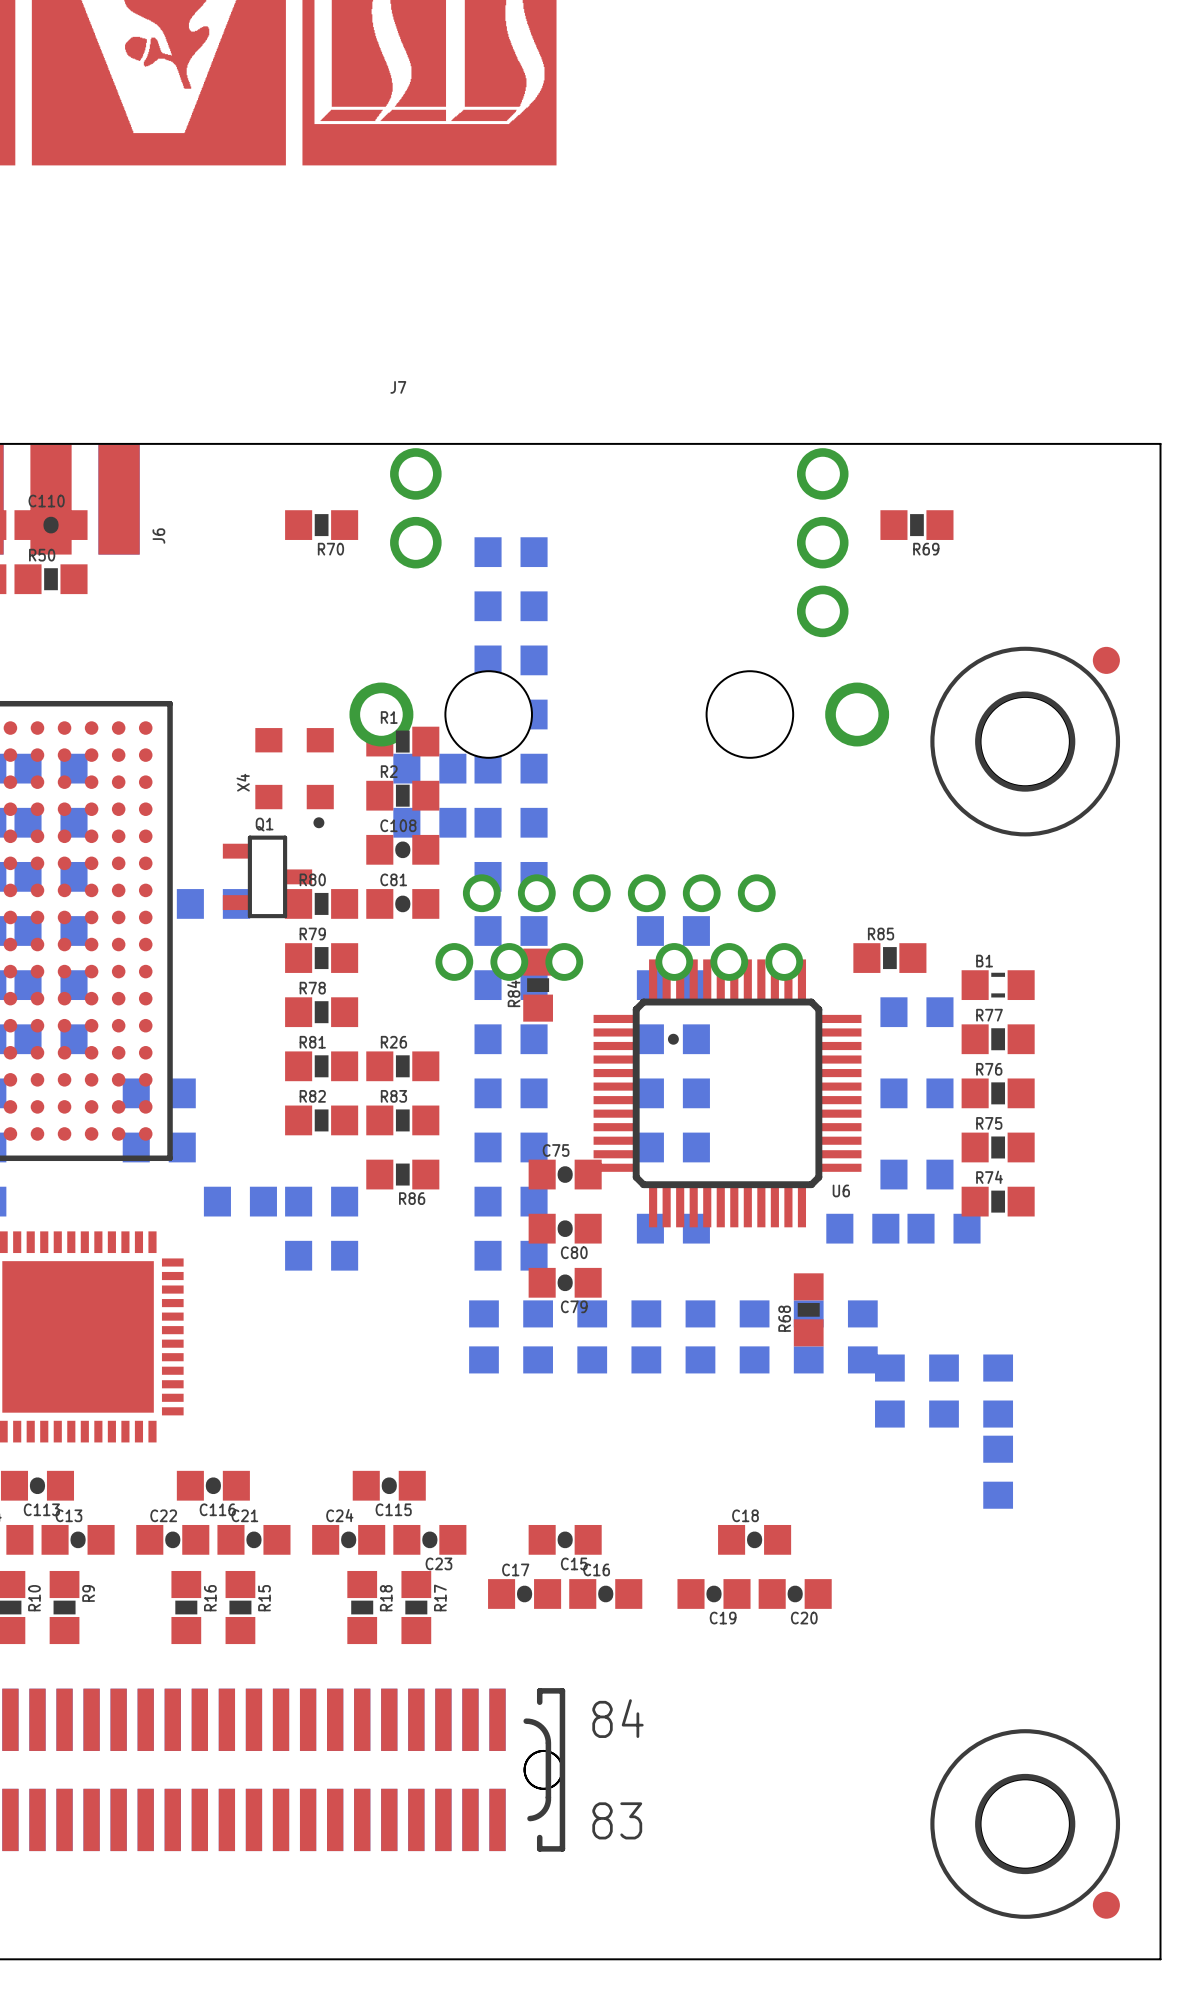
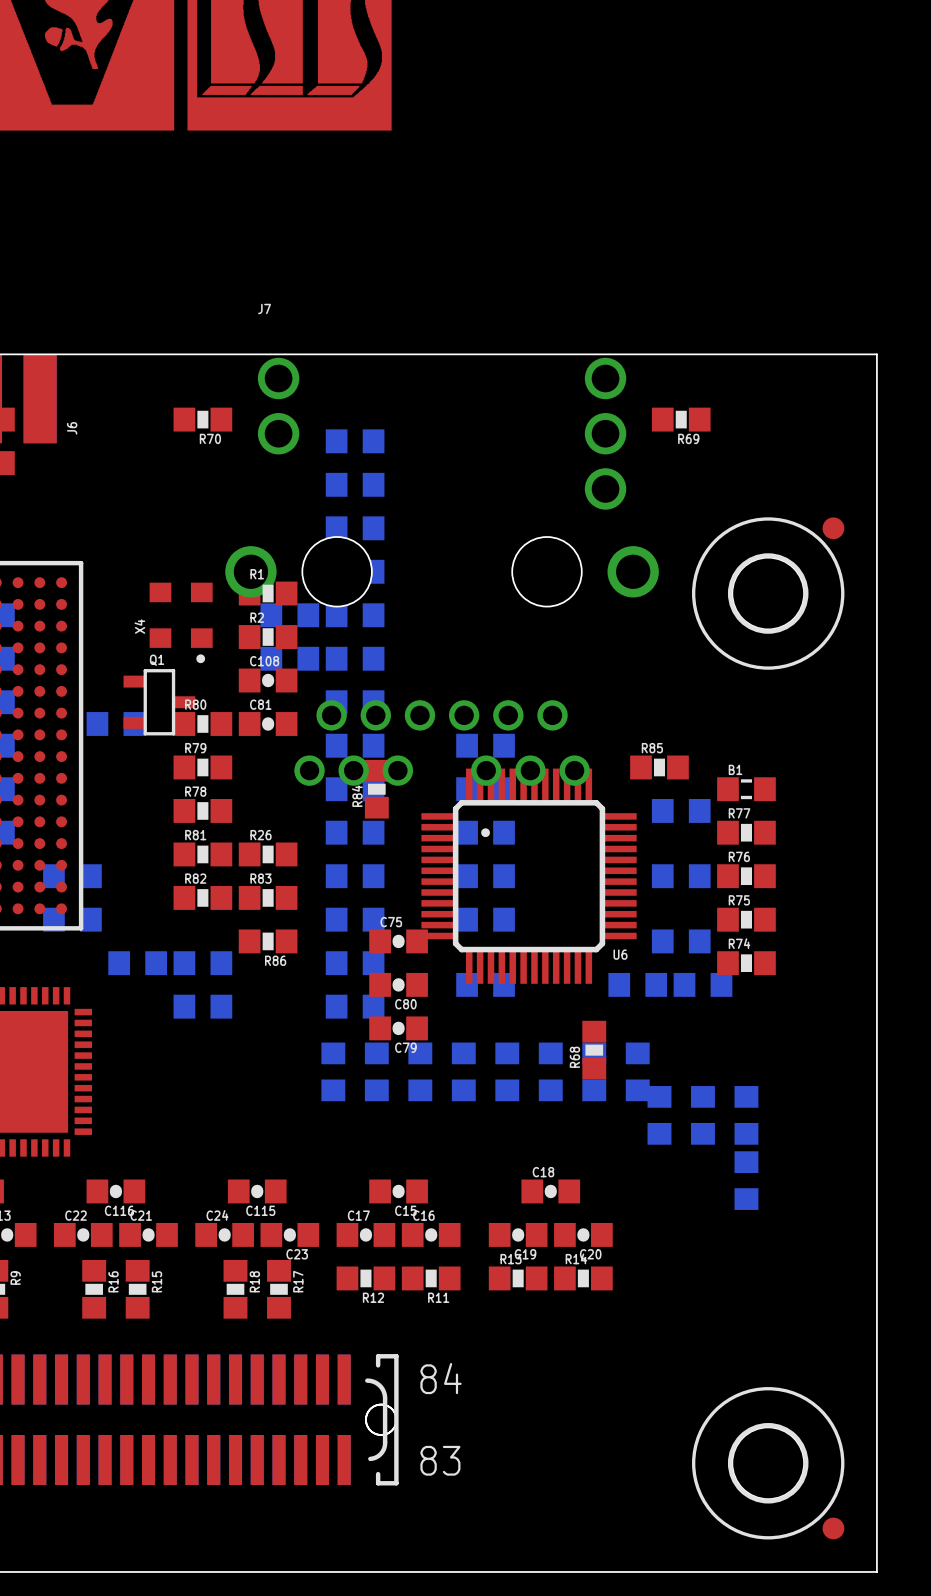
C15 position: (565, 1539) -> (398, 1191)
C18 position: (754, 1539) -> (550, 1191)
C17 position: (524, 1593) -> (365, 1234)
R12: none -> (365, 1278)
C16 position: (605, 1593) -> (431, 1234)
R11: none -> (431, 1278)
C19 position: (714, 1593) -> (518, 1234)
R13: none -> (518, 1278)
C20 position: (795, 1593) -> (583, 1234)
R14: none -> (583, 1278)

